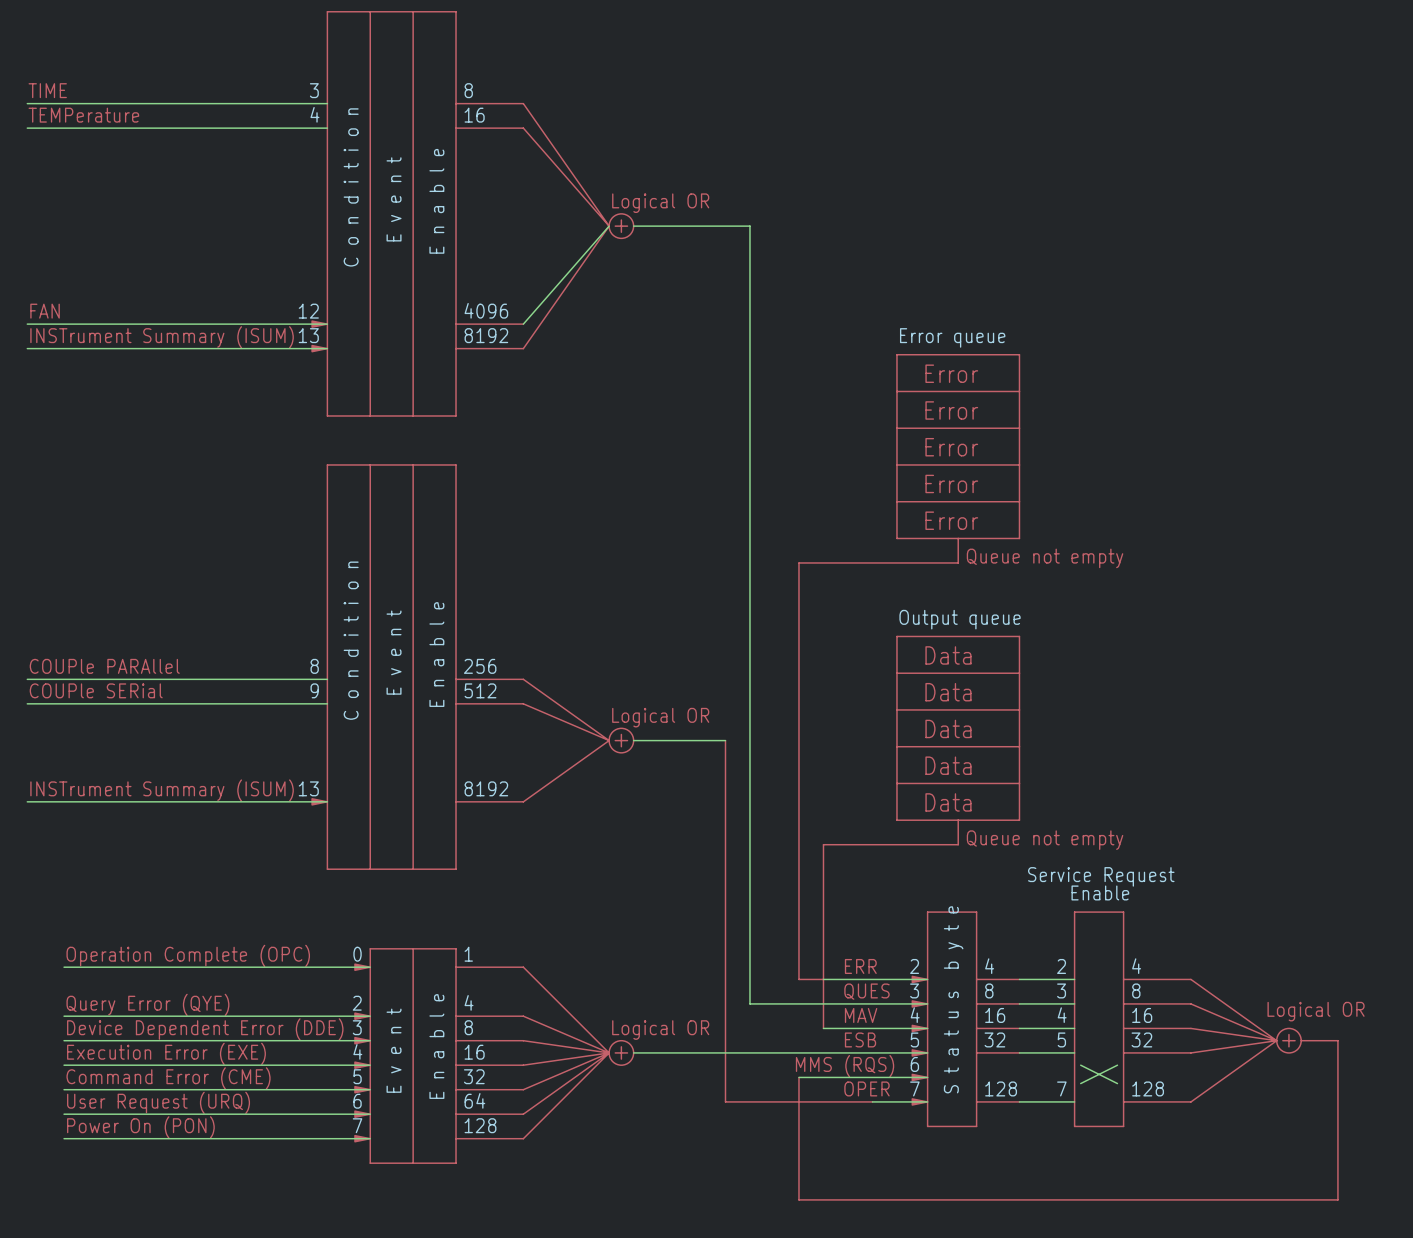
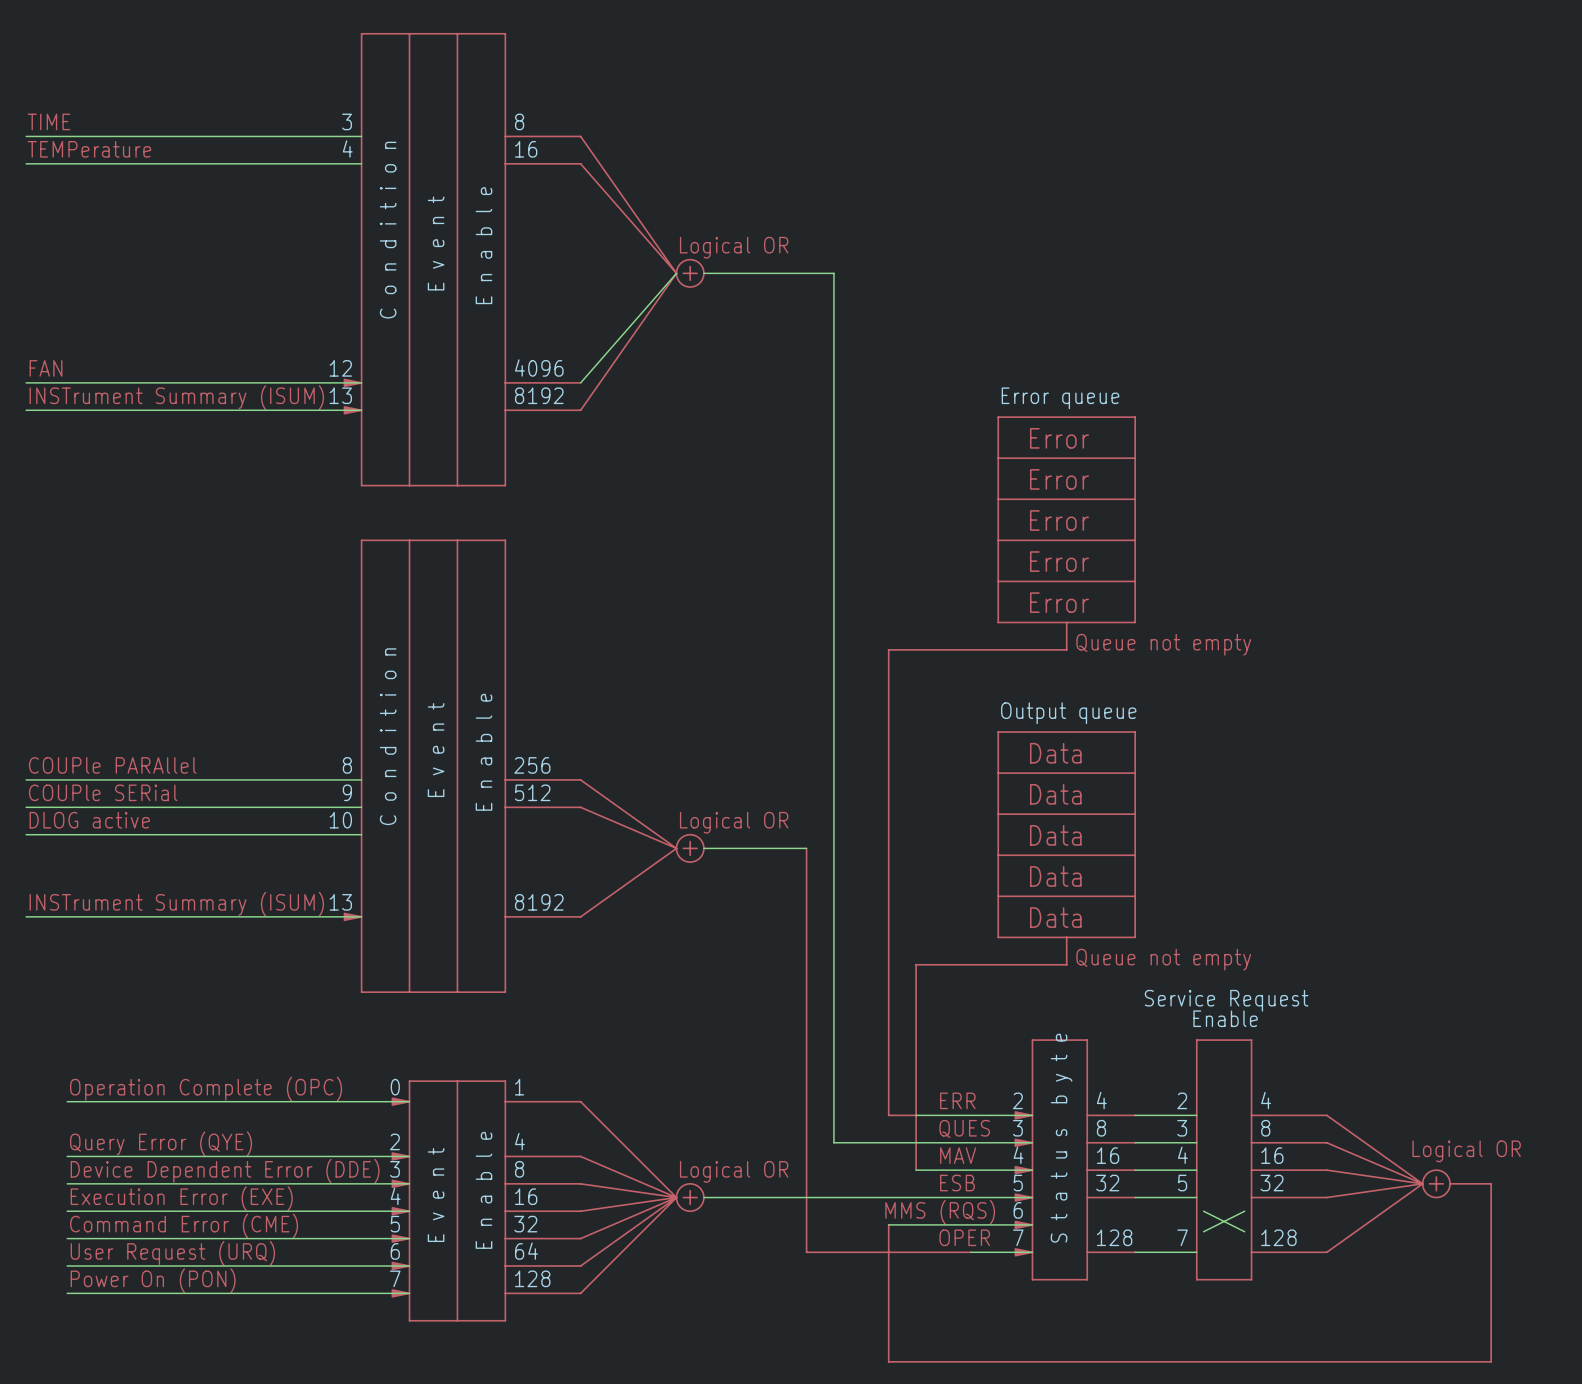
text: none -> DLOG active (89, 820)
text: none -> 10 (340, 820)
wire: none -> (26, 834) (361, 834)

